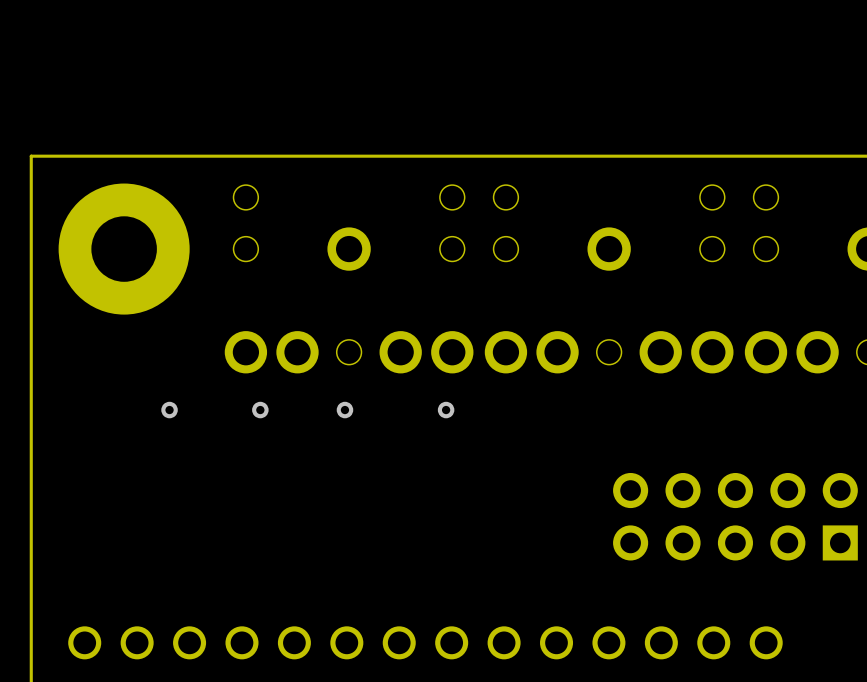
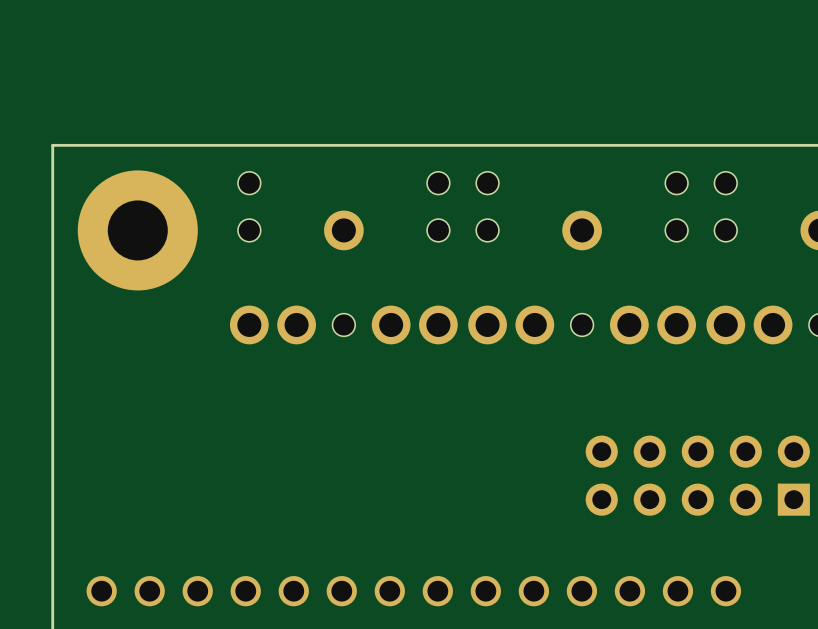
via: (169, 410) -> none
via: (260, 410) -> none
via: (344, 410) -> none
via: (446, 410) -> none

